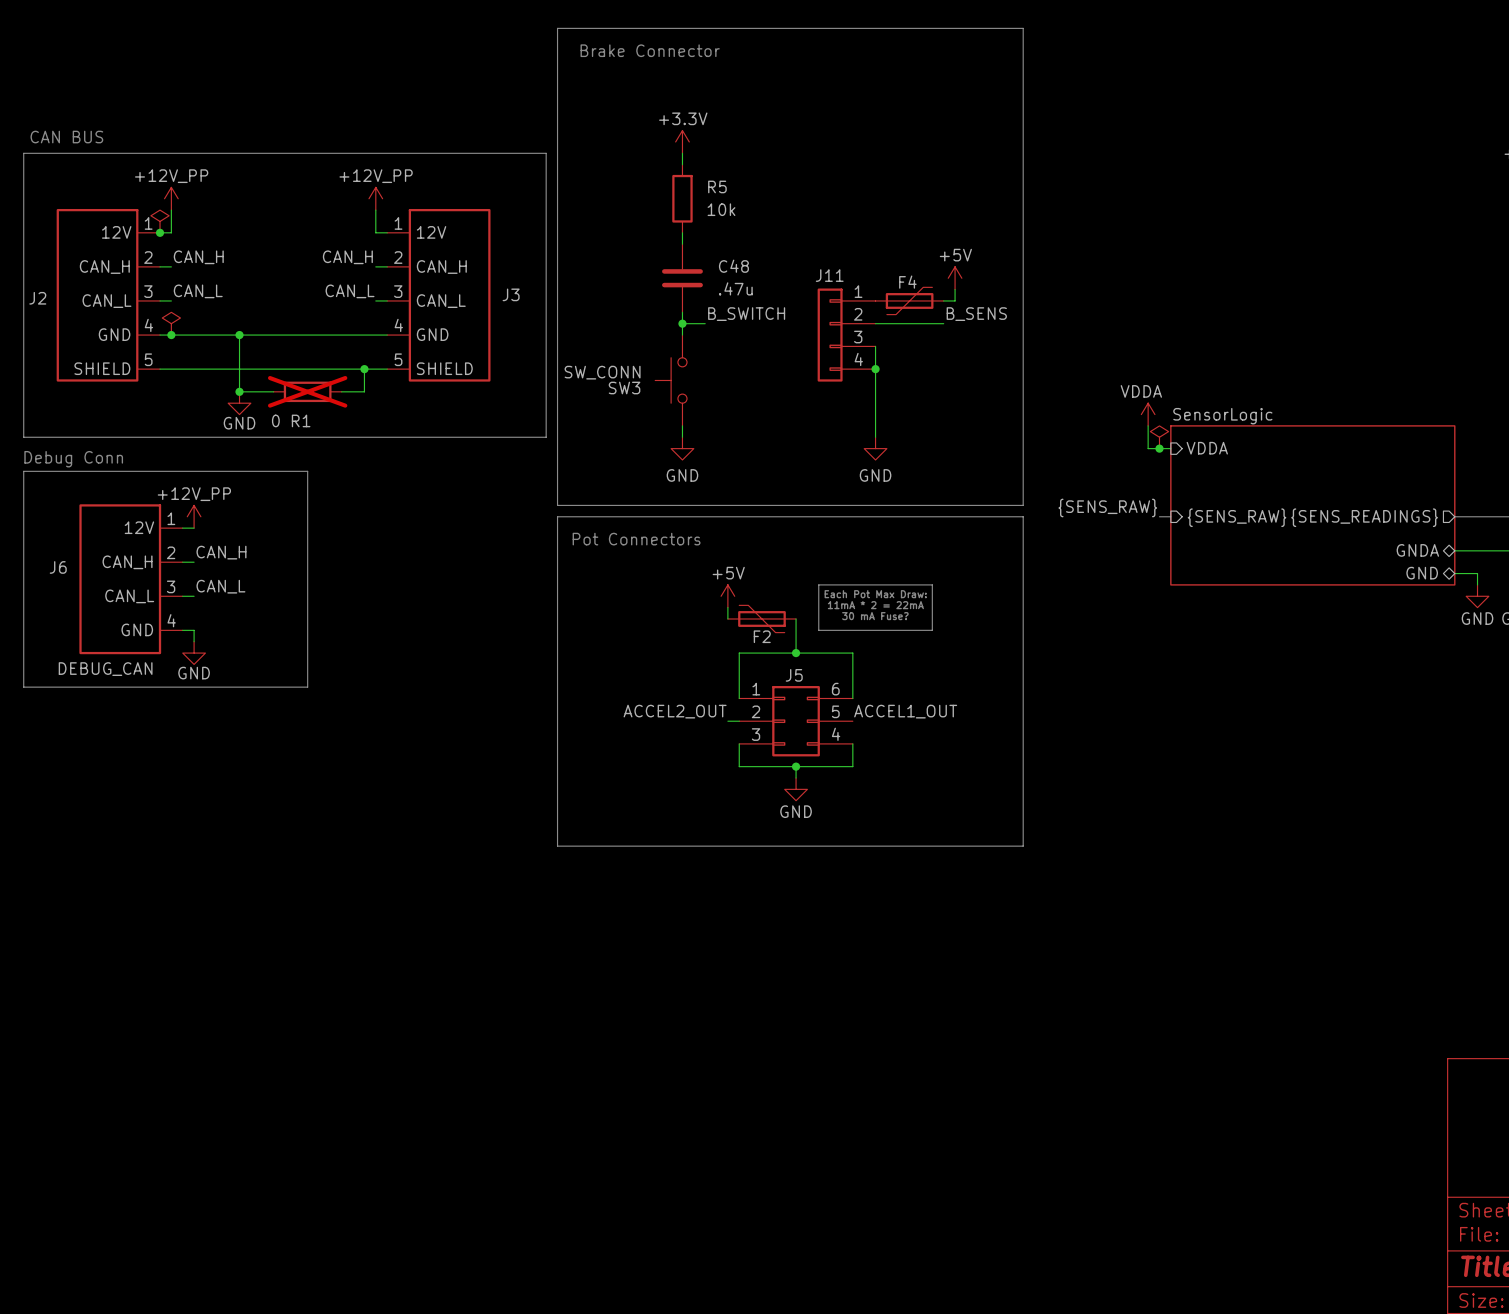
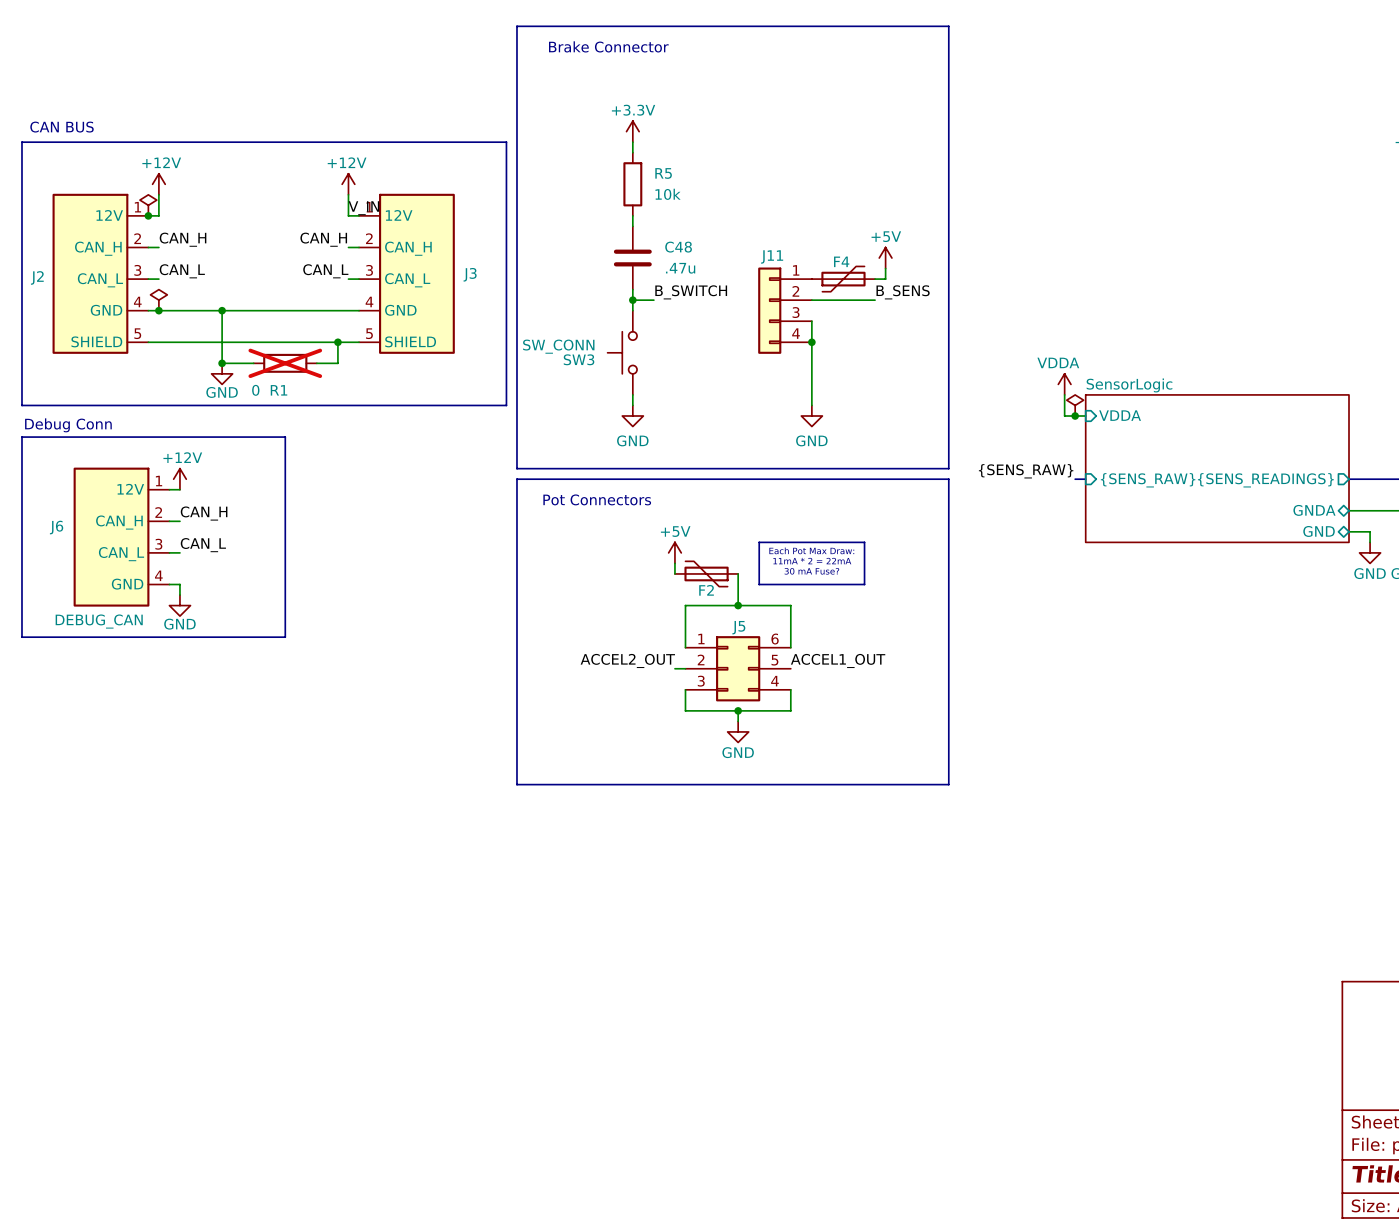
power symbol: +12V_PP (171, 198) -> +12V (158, 184)
power symbol: +12V_PP (375, 198) -> +12V (348, 184)
label: none -> V_IN (363, 208)
power symbol: +12V_PP (194, 516) -> +12V (179, 479)

